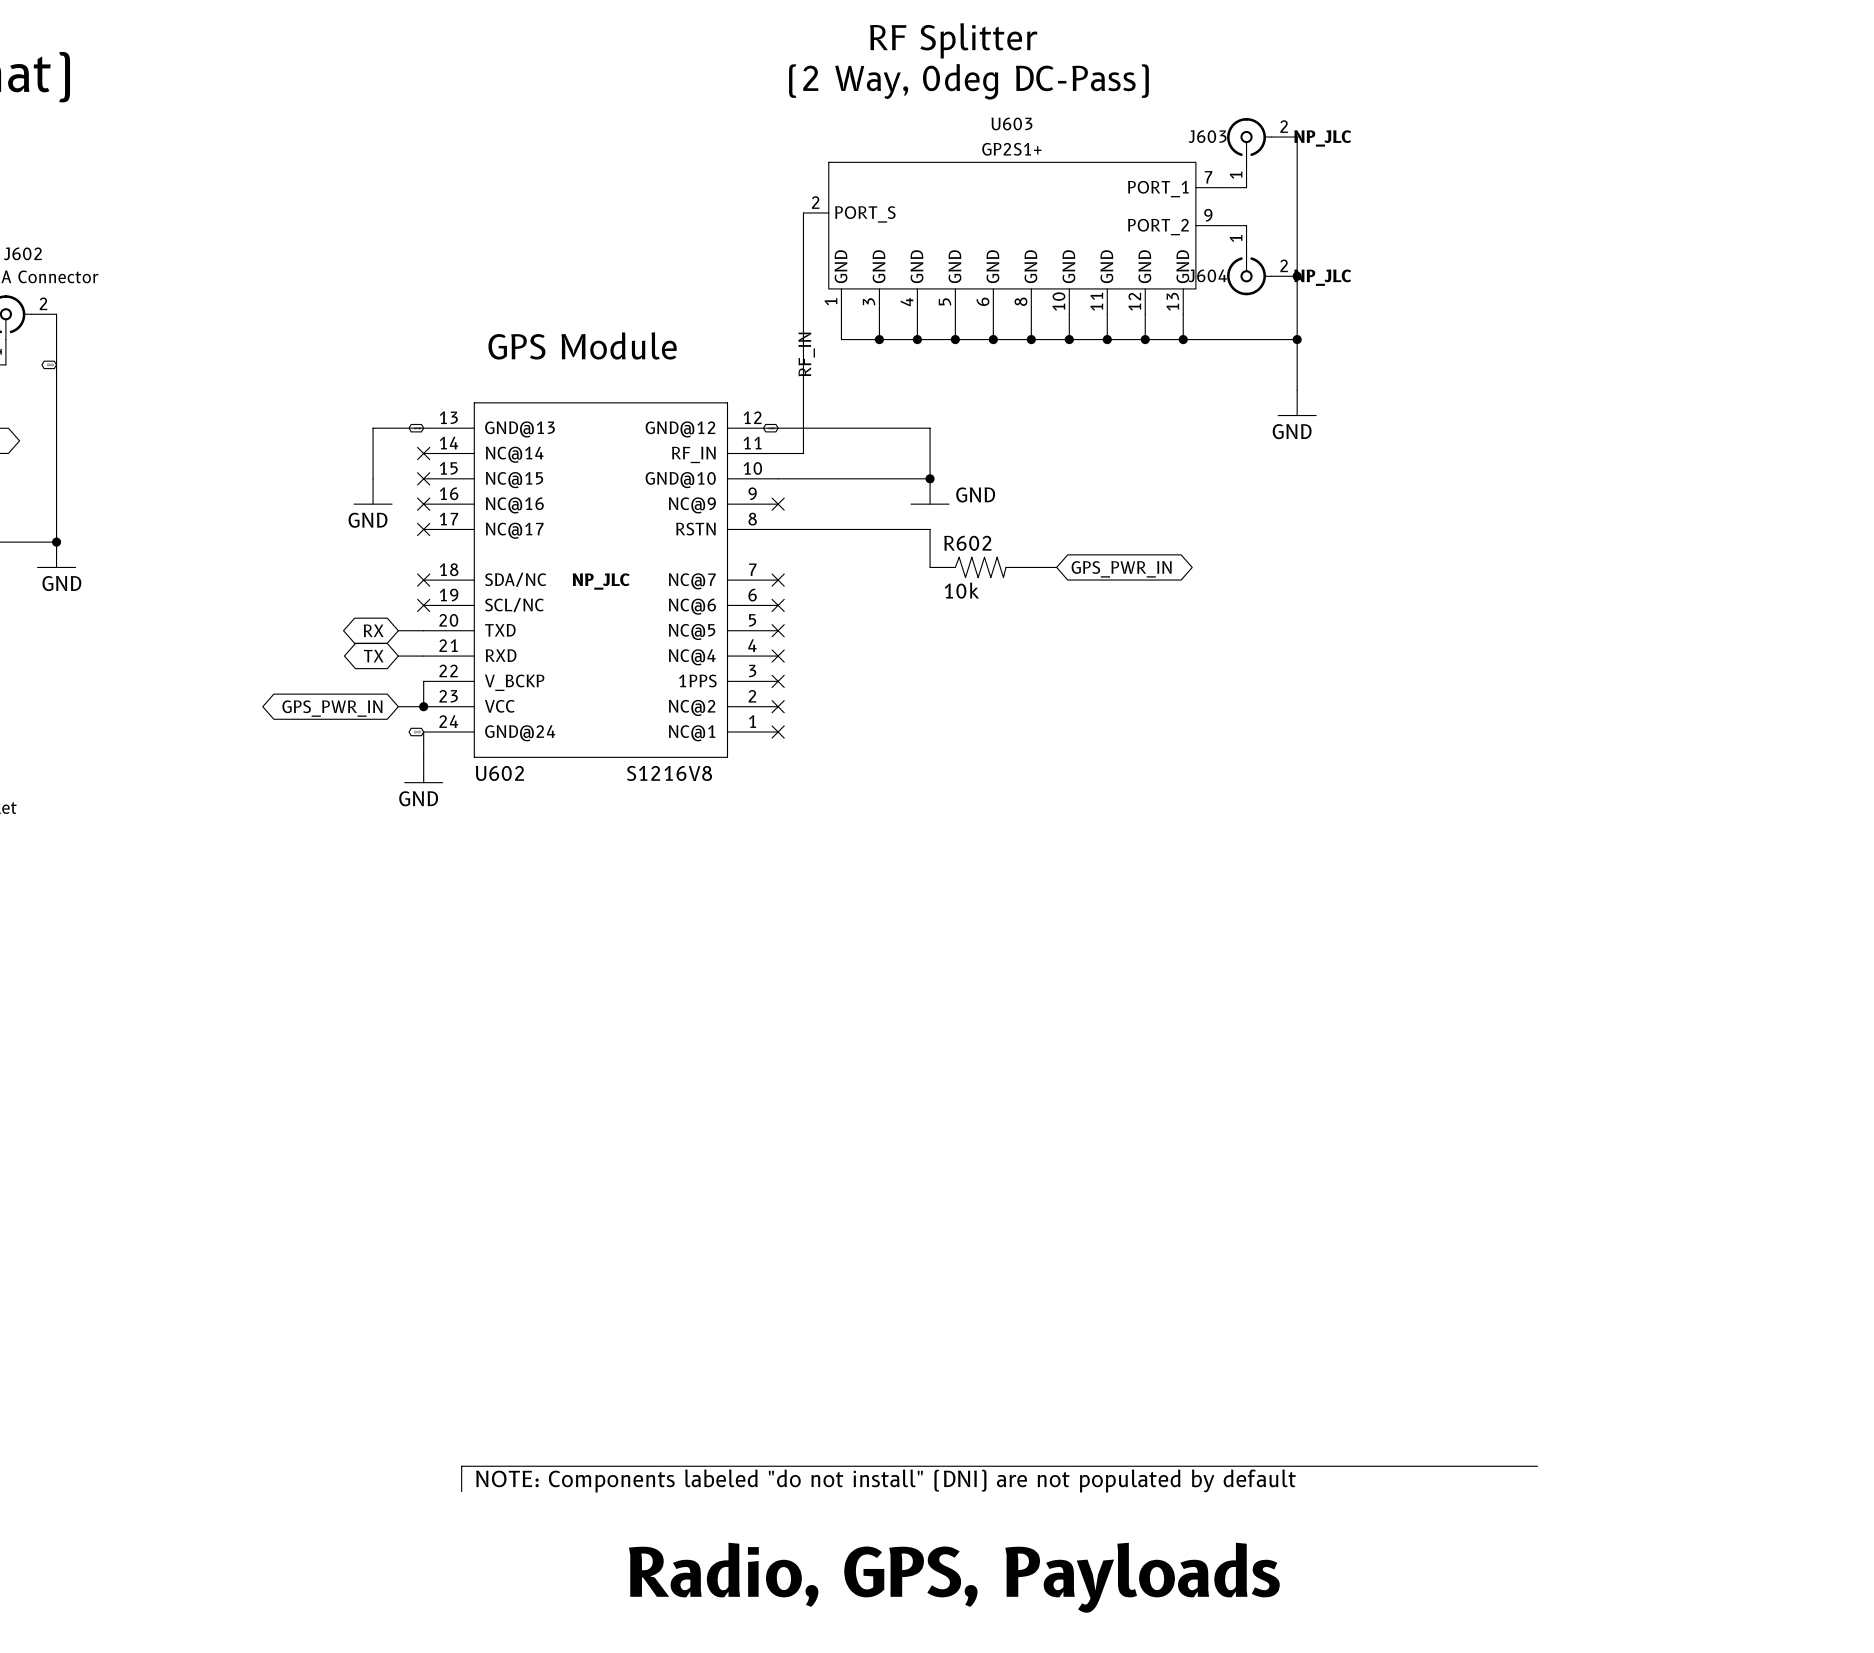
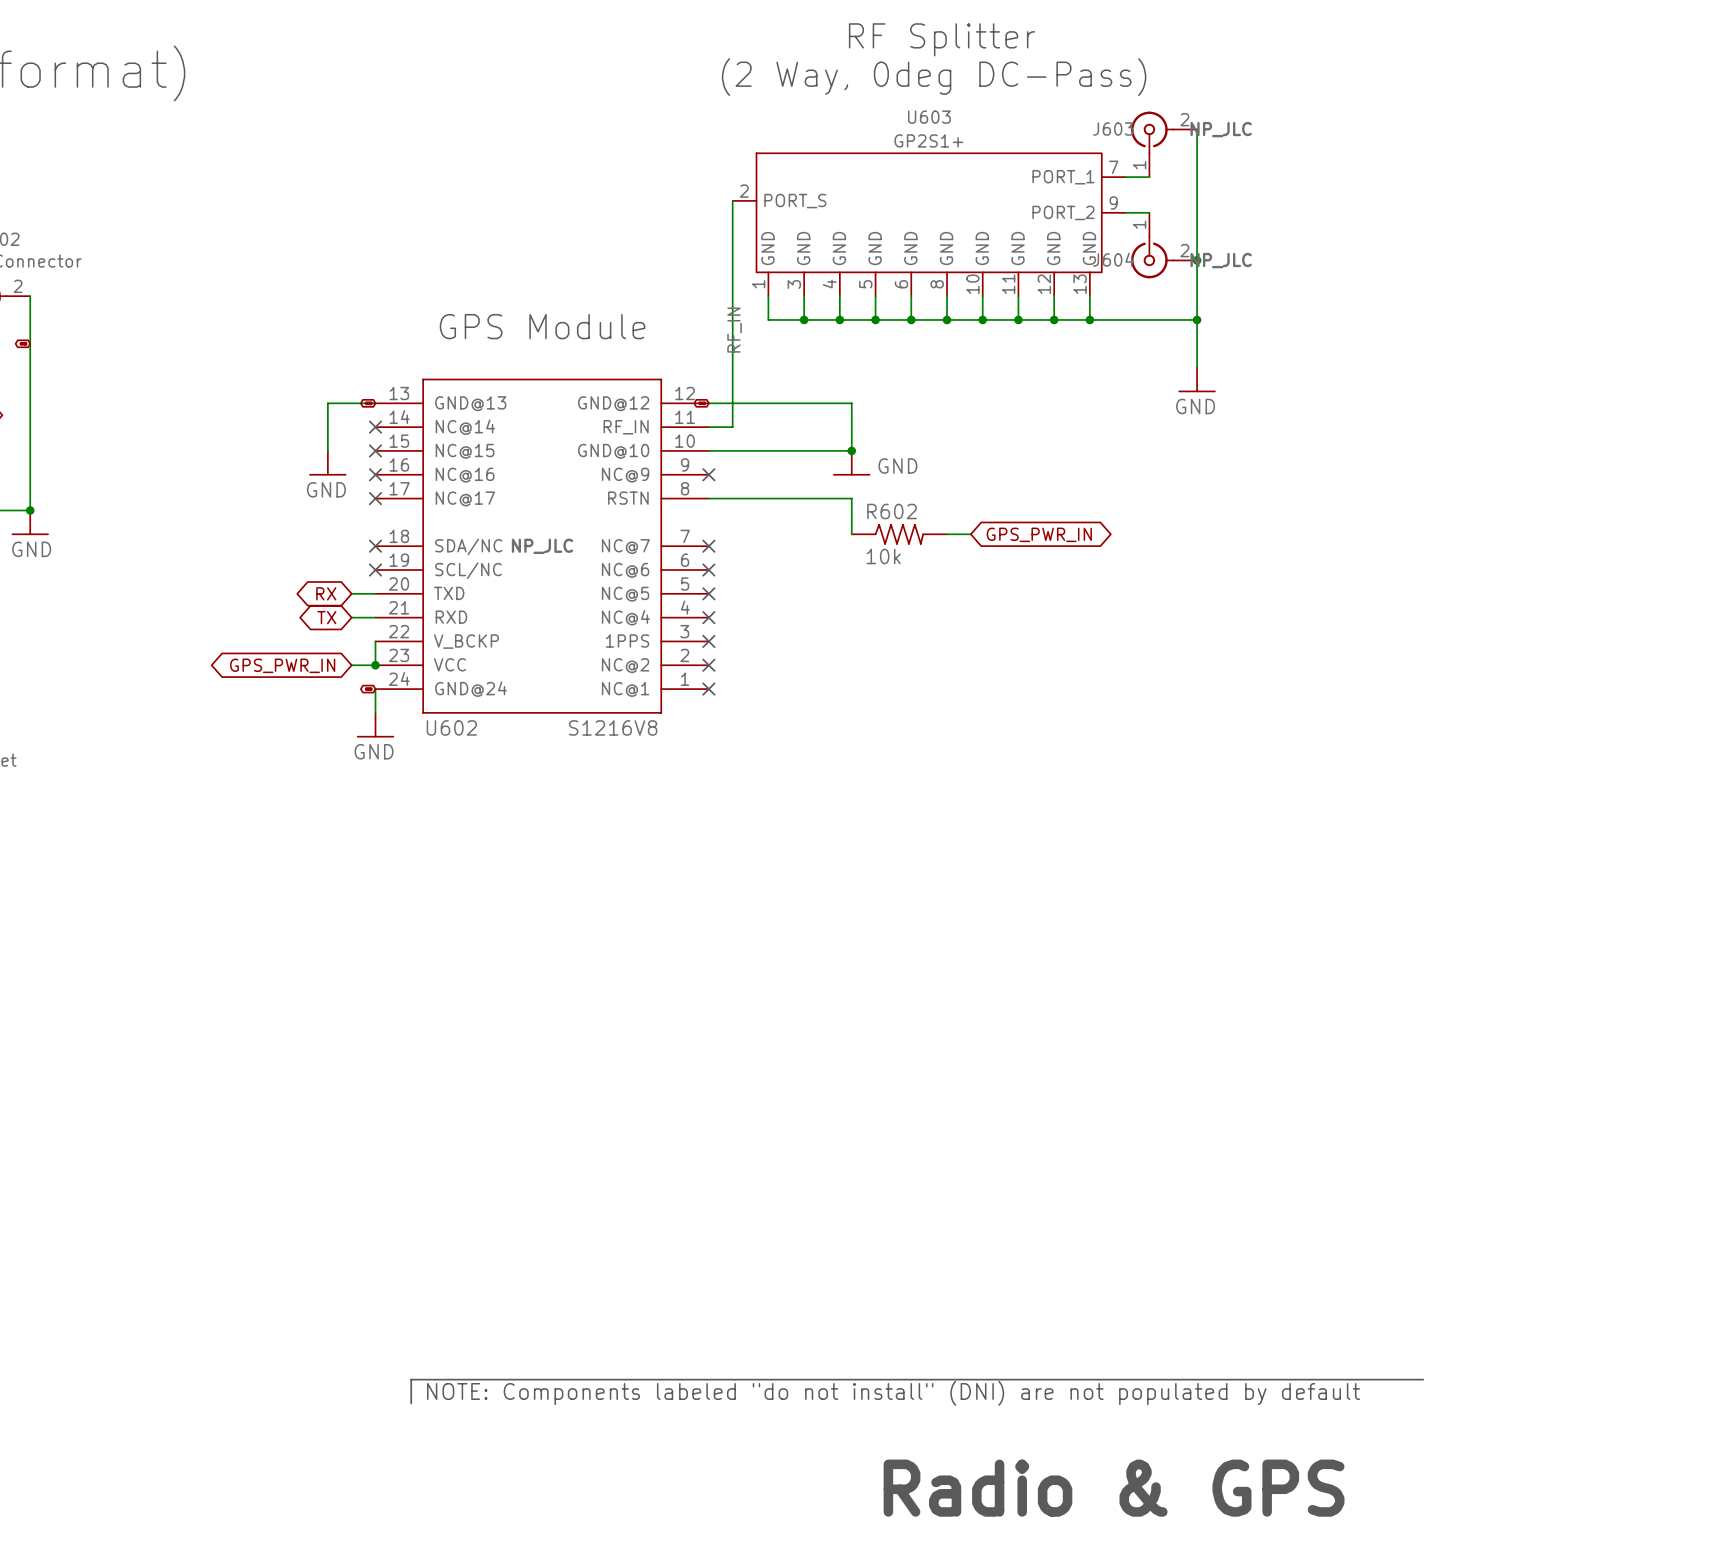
text: Radio, GPS, Payloads (954, 1577) -> none
text: none -> Radio & GPS (1114, 1488)

